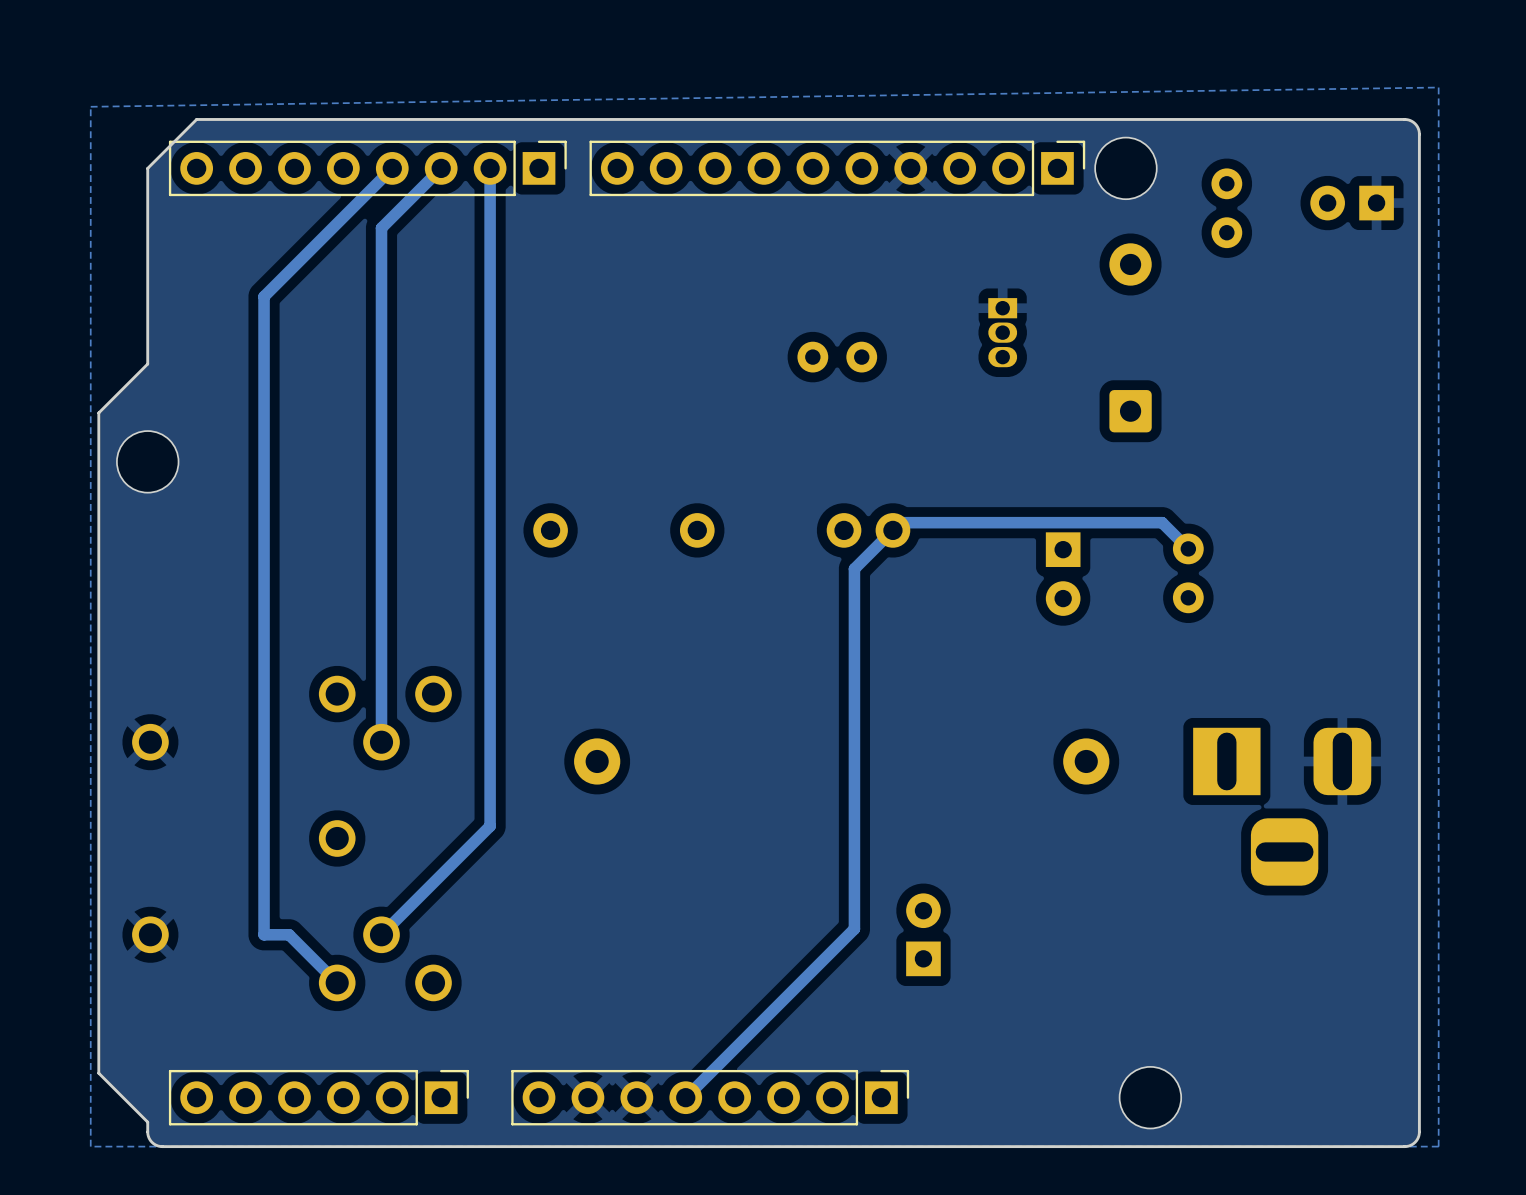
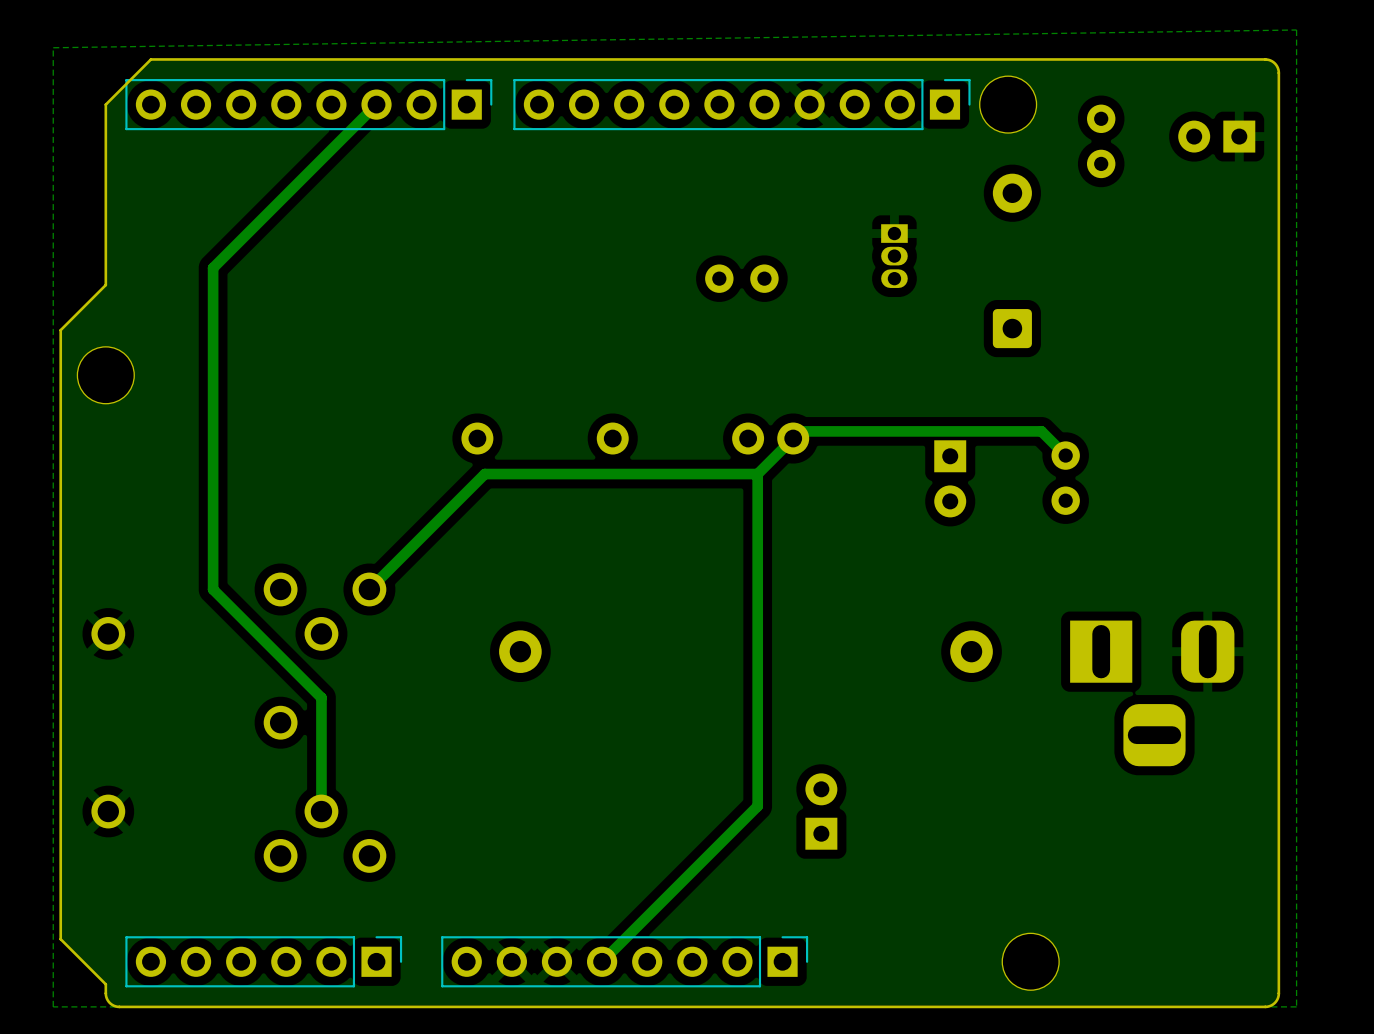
track: (392, 168) (264, 296) (264, 345) -> (321, 159) (213, 268)
track: (490, 168) (490, 826) (381, 934) -> none
track: (381, 228) (381, 742) -> none
track: none -> (757, 474) (484, 474) (369, 589)
track: (264, 694) (264, 934) (289, 934) (337, 982) -> (213, 589) (321, 697) (321, 811)

